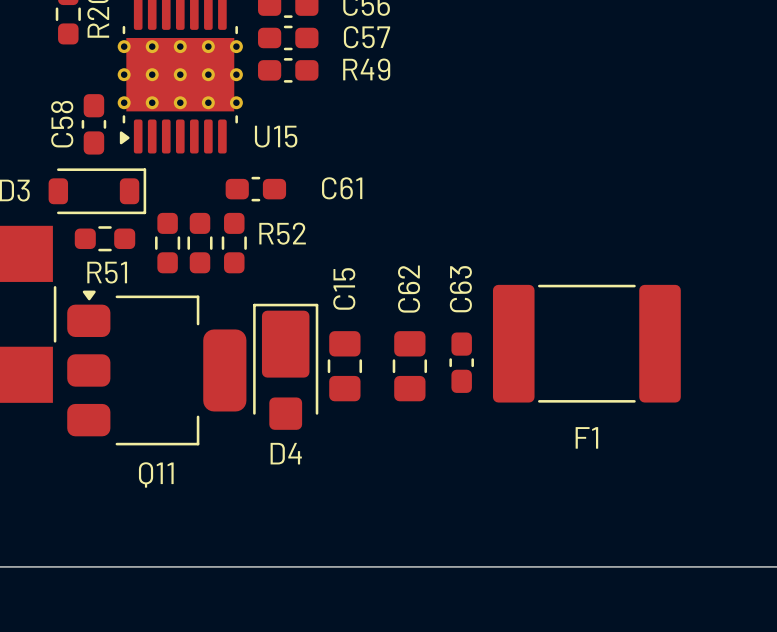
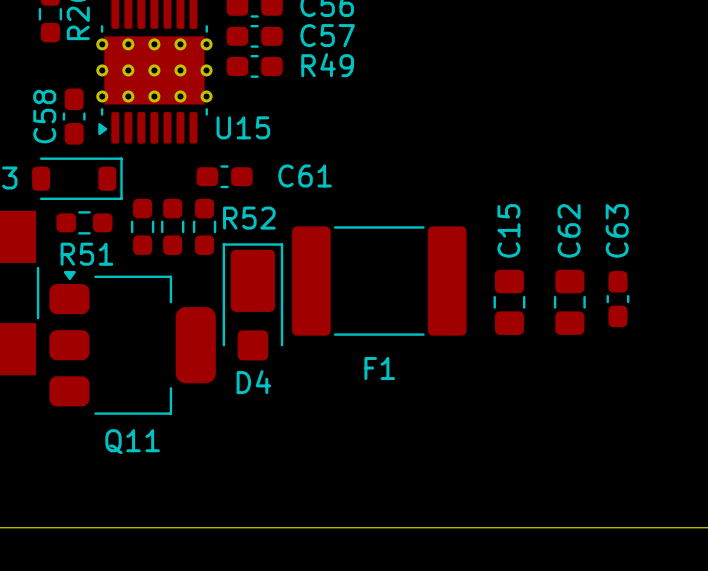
F1 position: (586, 343) -> (379, 281)
C63 position: (461, 362) -> (617, 299)
D4 position: (285, 366) -> (252, 301)
C15 position: (344, 366) -> (509, 302)
C62 position: (409, 366) -> (569, 302)

